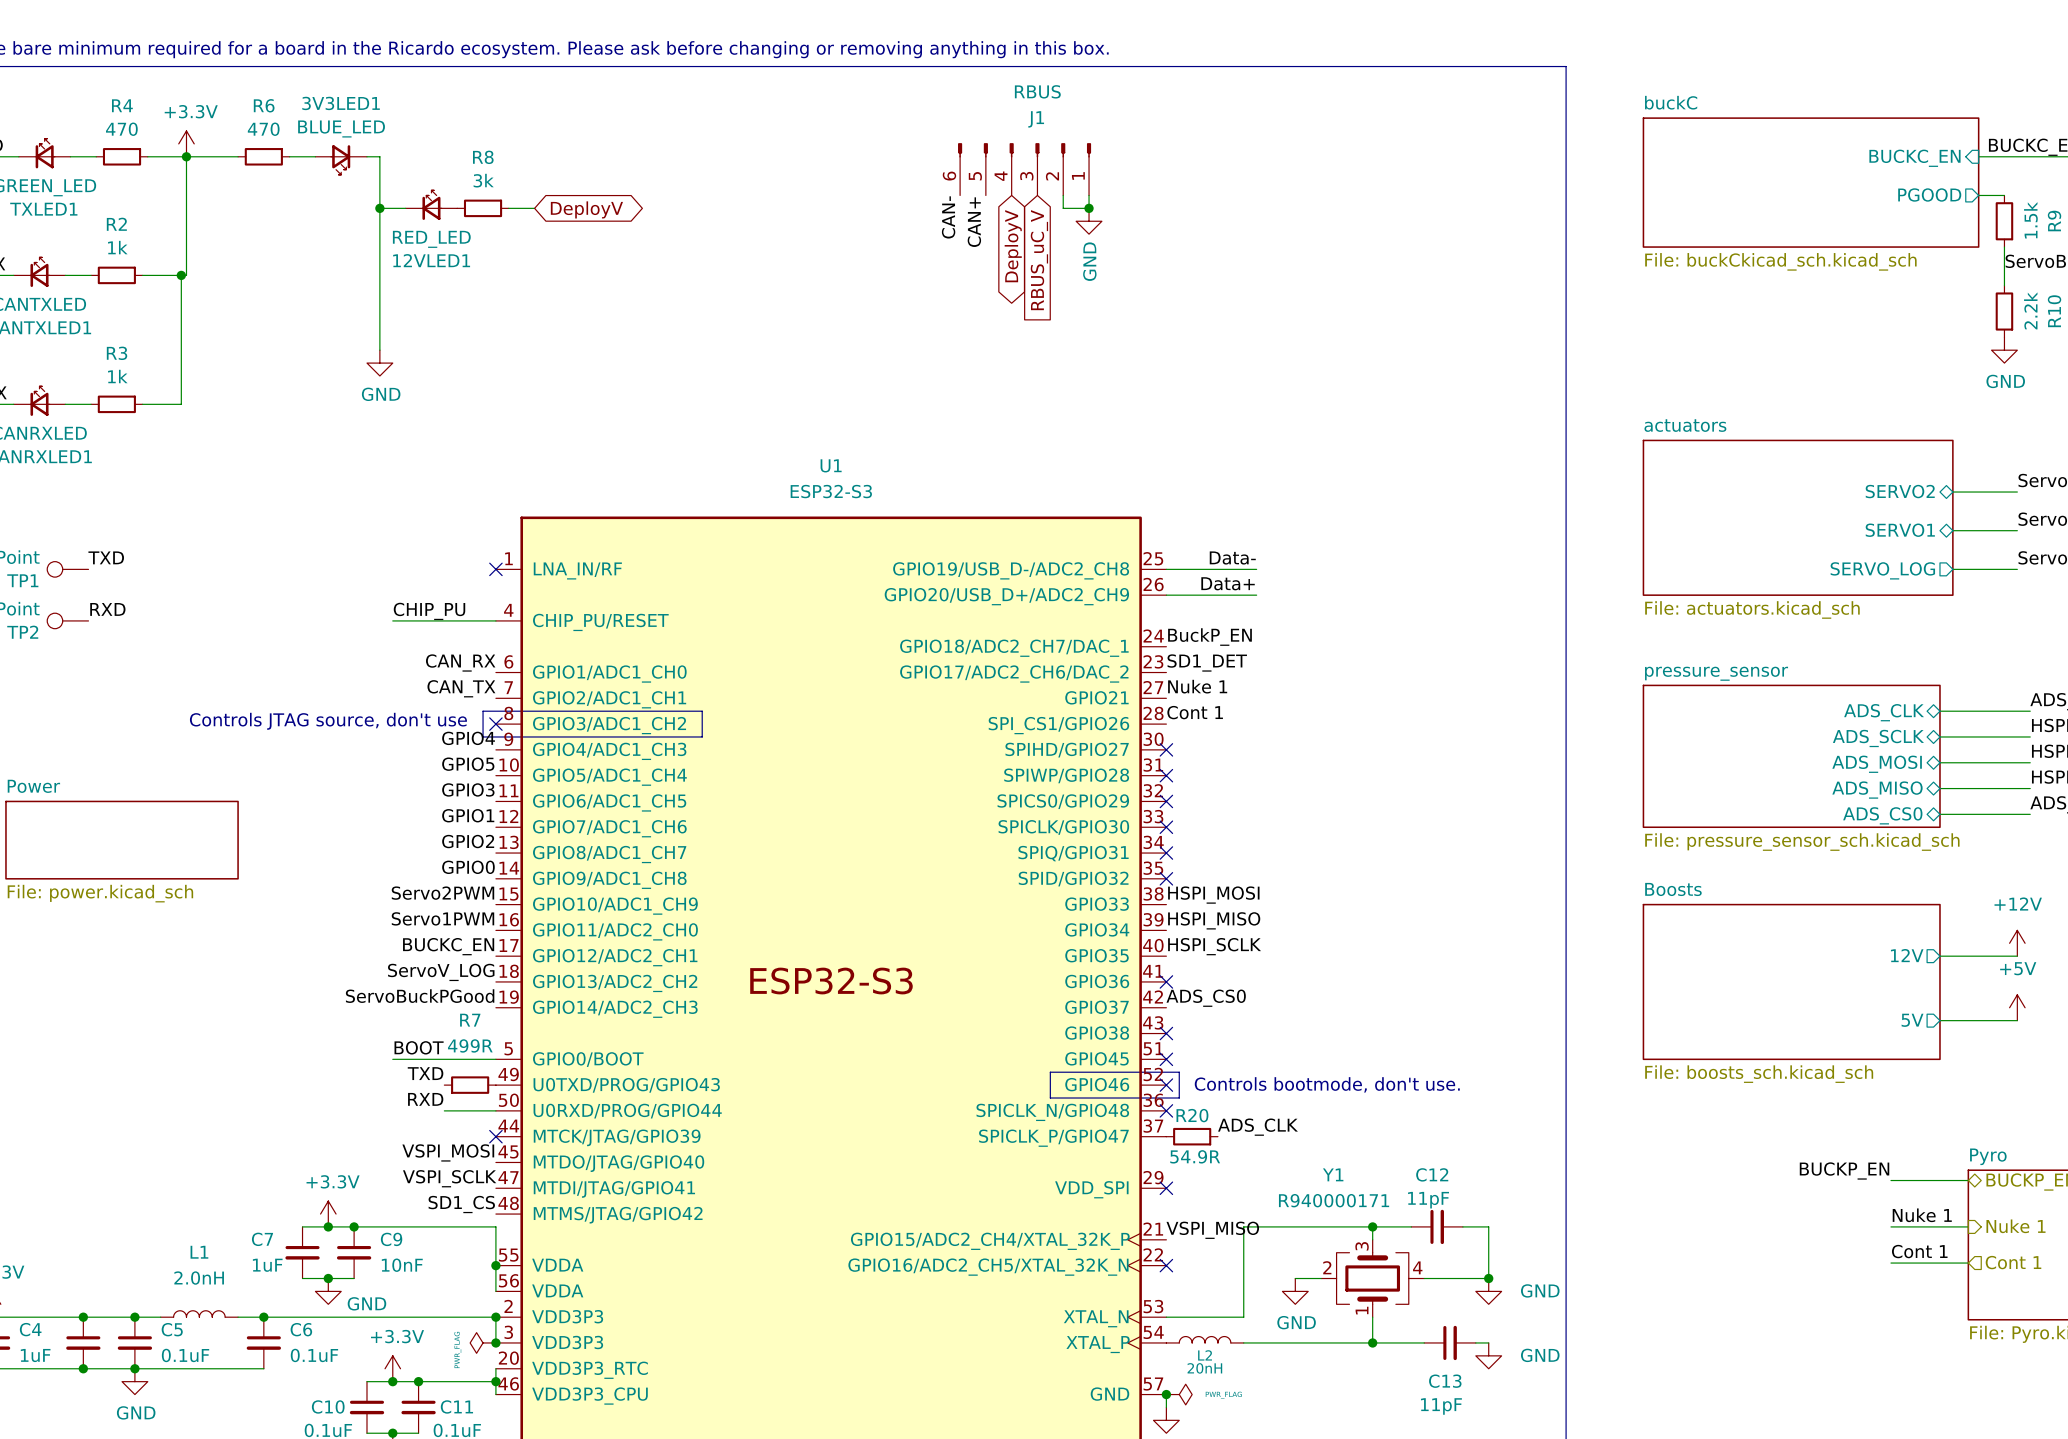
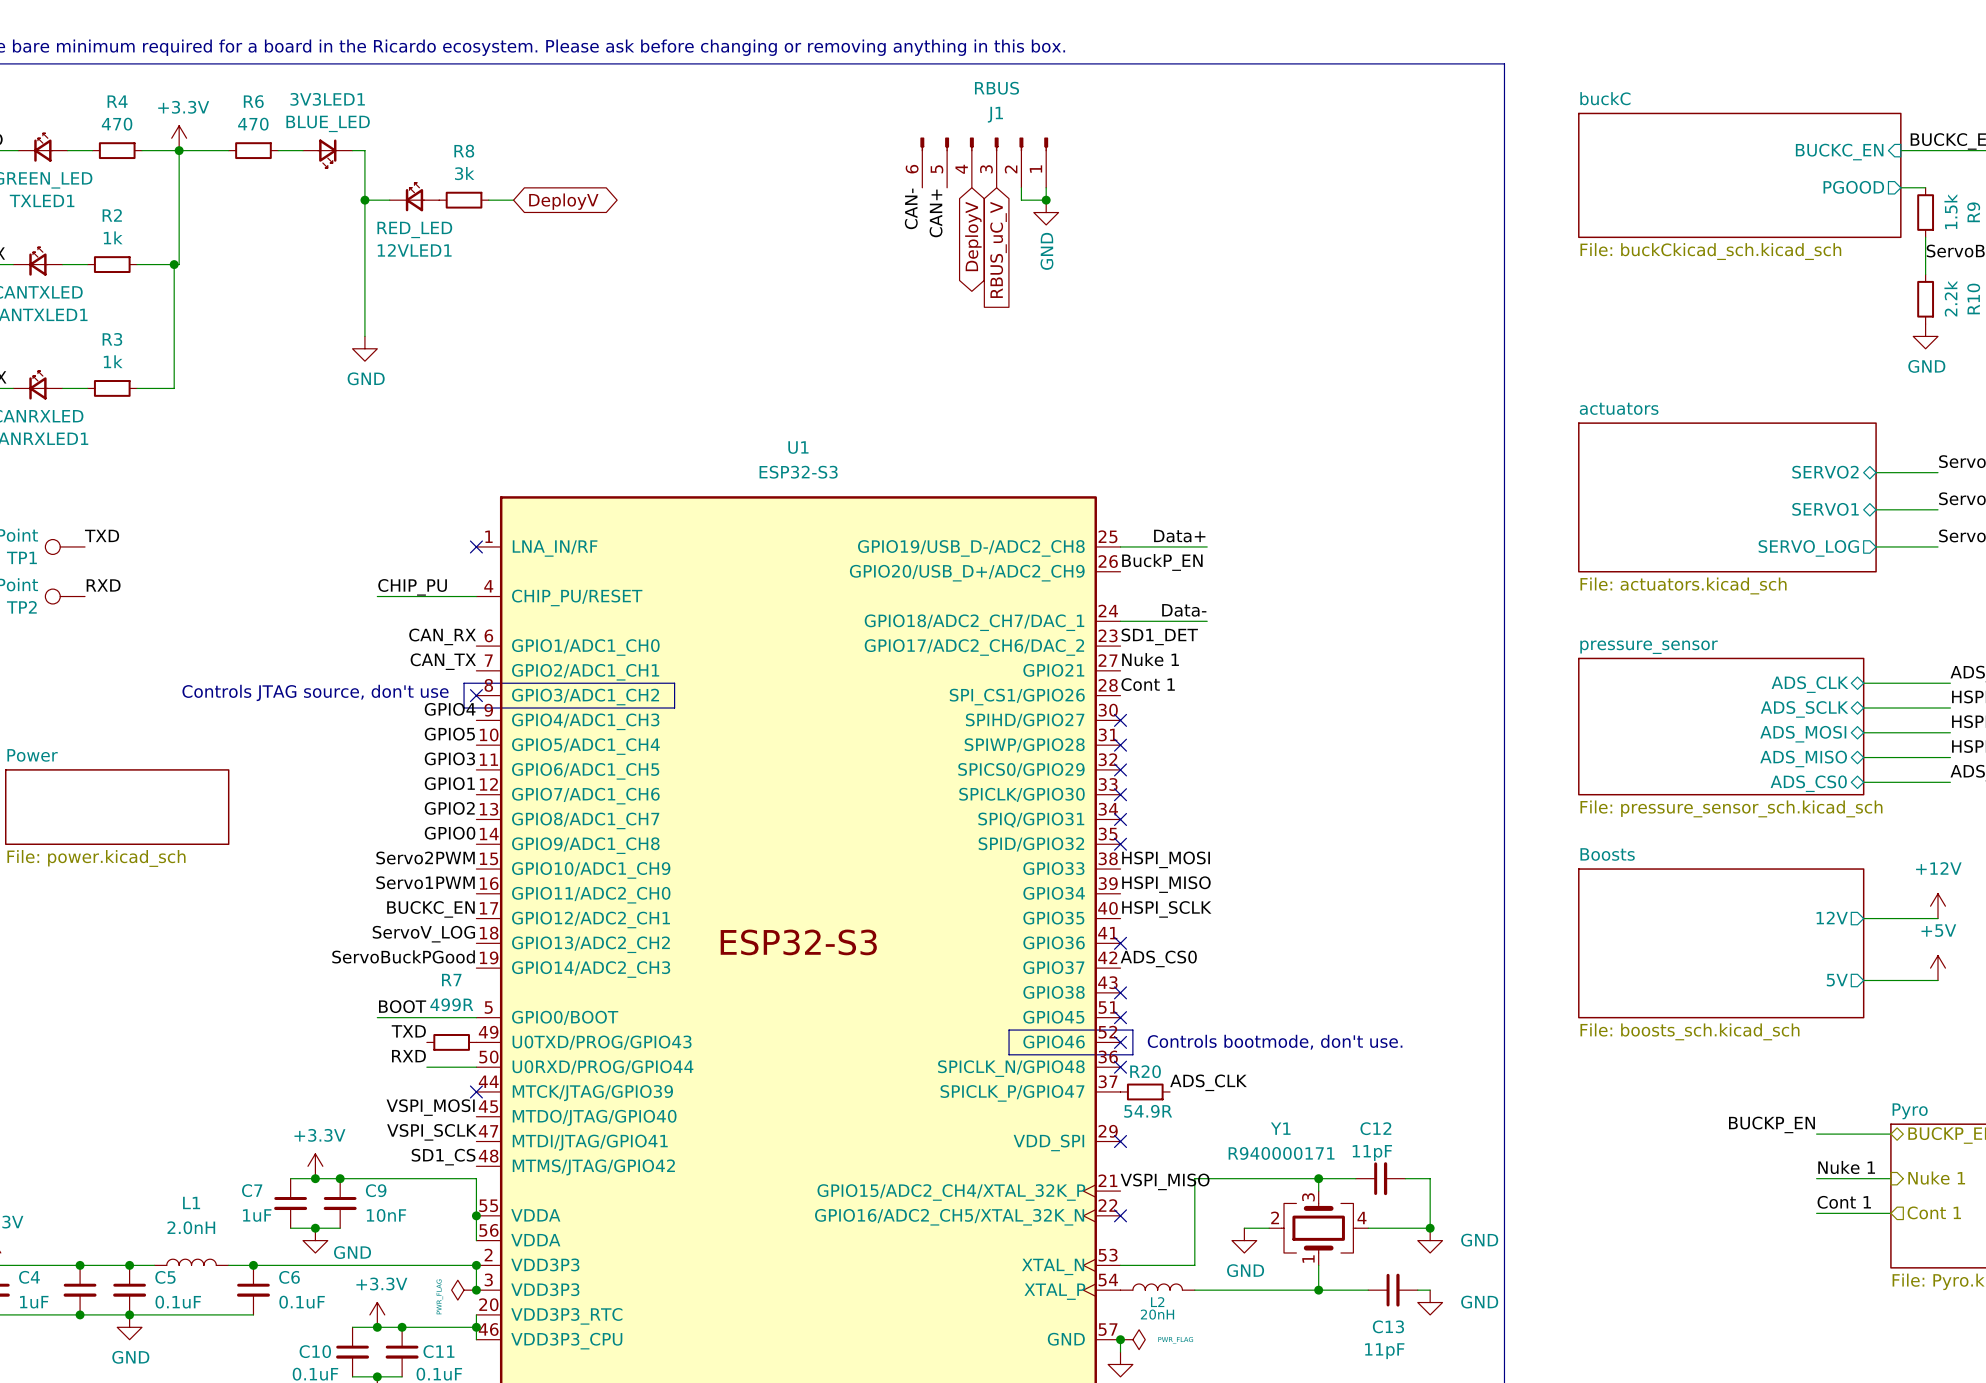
label: Data- (1232, 557) -> Data+ (1179, 536)
label: Data+ (1228, 583) -> none
wire: (1166, 595) (1256, 595) -> (1120, 621) (1207, 621)
label: none -> Data- (1184, 610)
label position: BuckP_EN (1209, 637) -> BuckP_EN (1162, 562)

